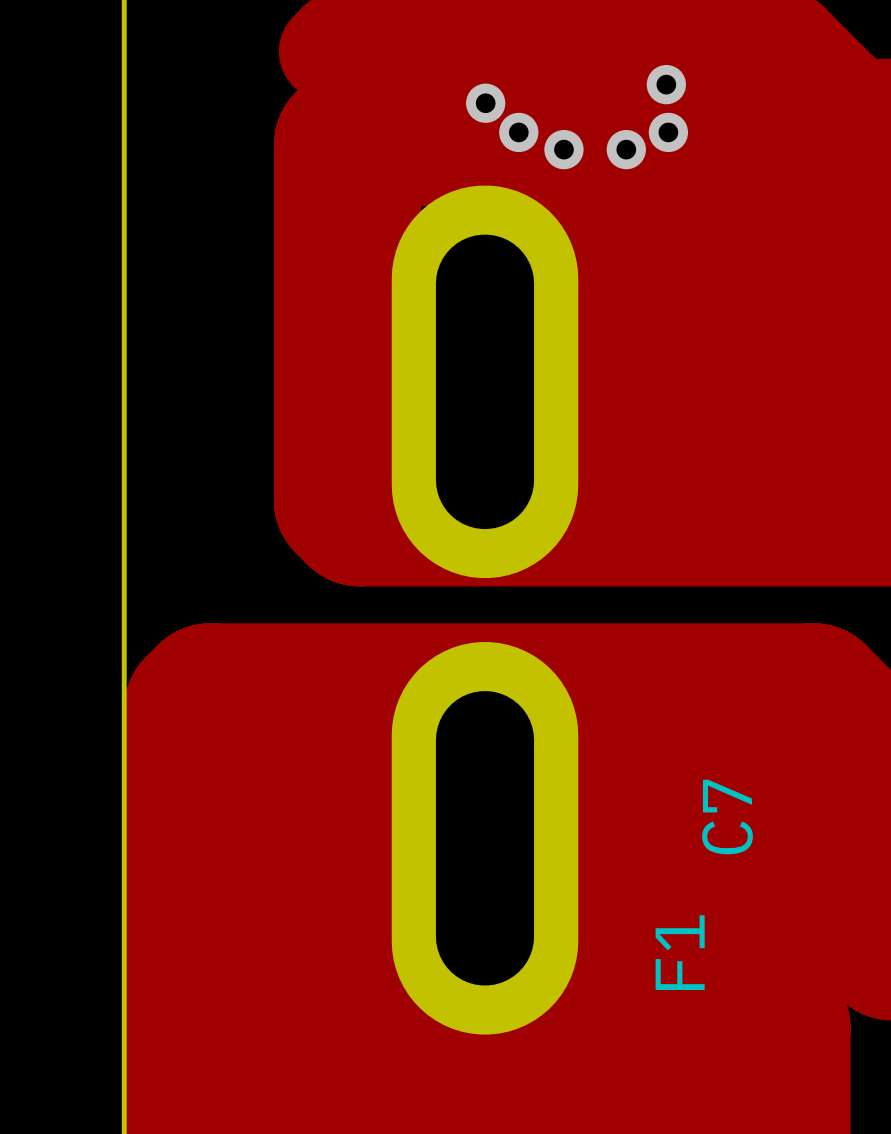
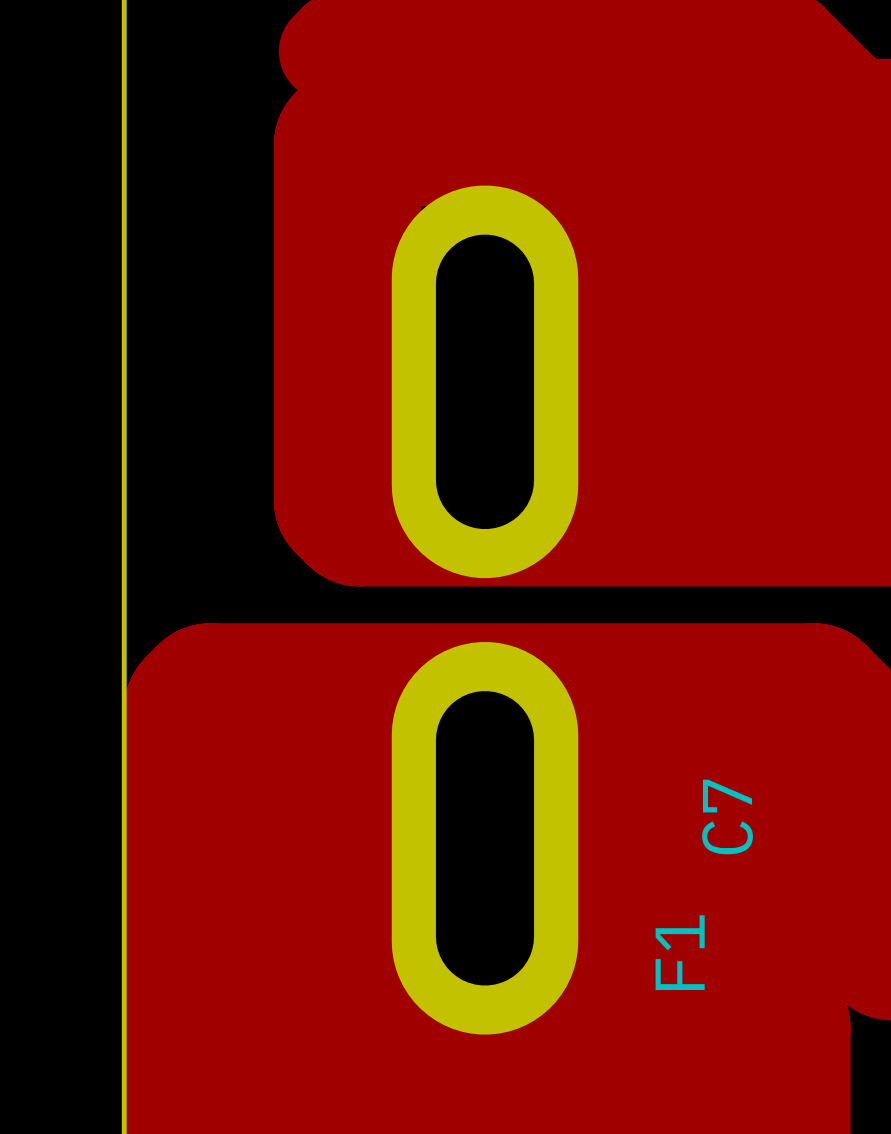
via: (666, 84) -> none
via: (485, 103) -> none
via: (518, 132) -> none
via: (668, 132) -> none
via: (563, 149) -> none
via: (626, 149) -> none

